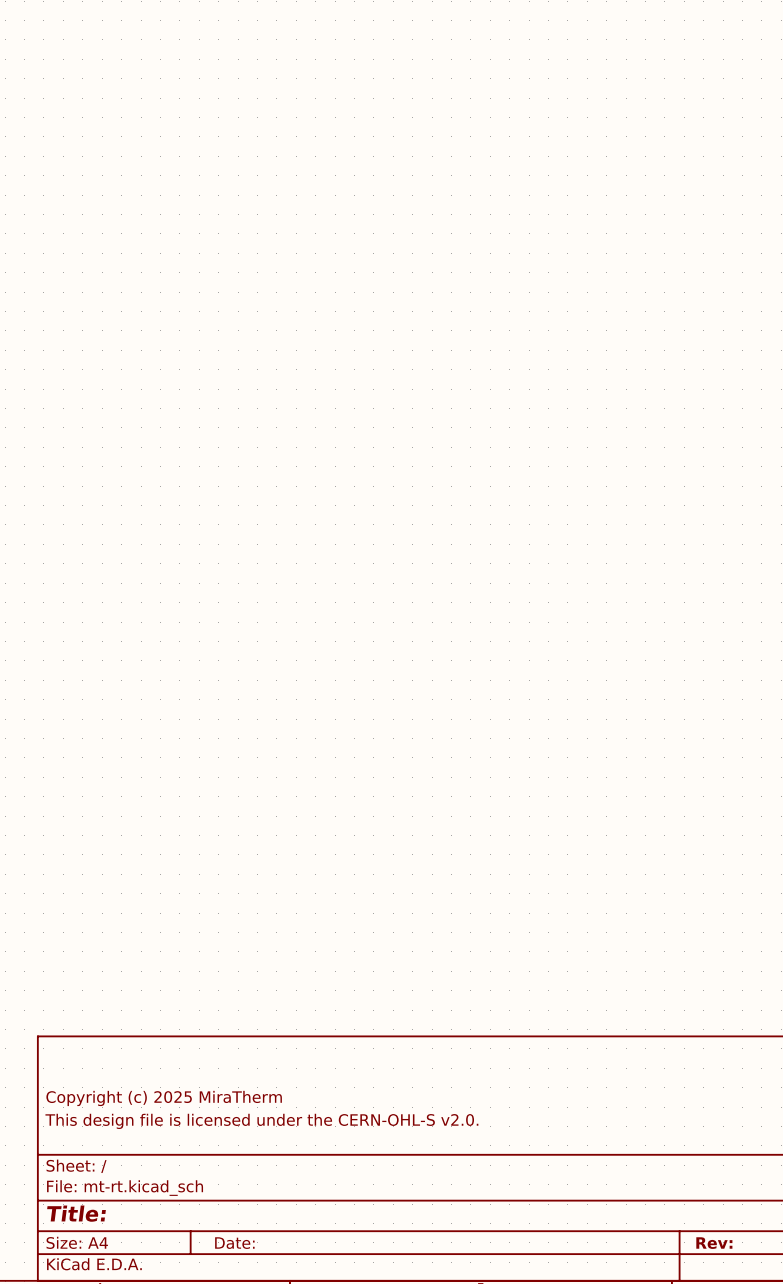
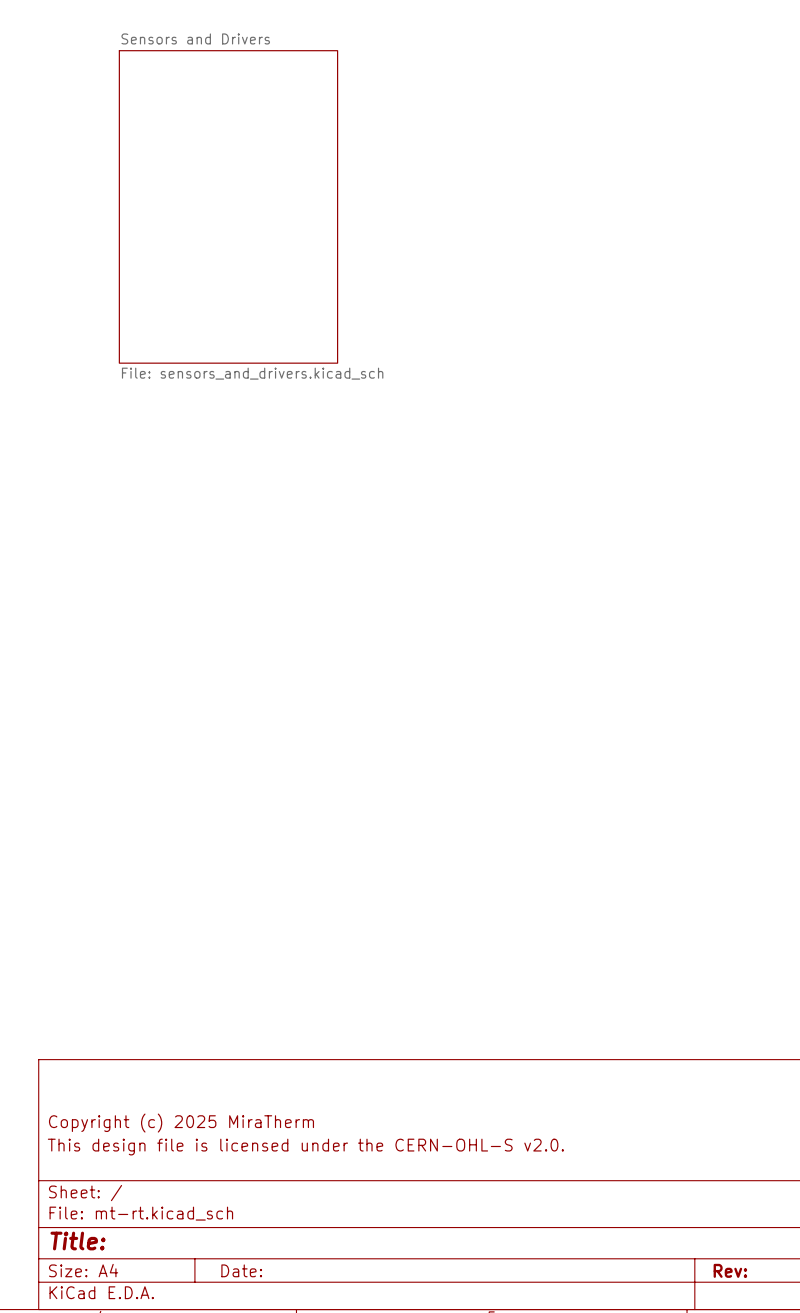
sheet Sensors and Drivers: none -> File: sensors_and_drivers.kicad_sch (228, 206)

